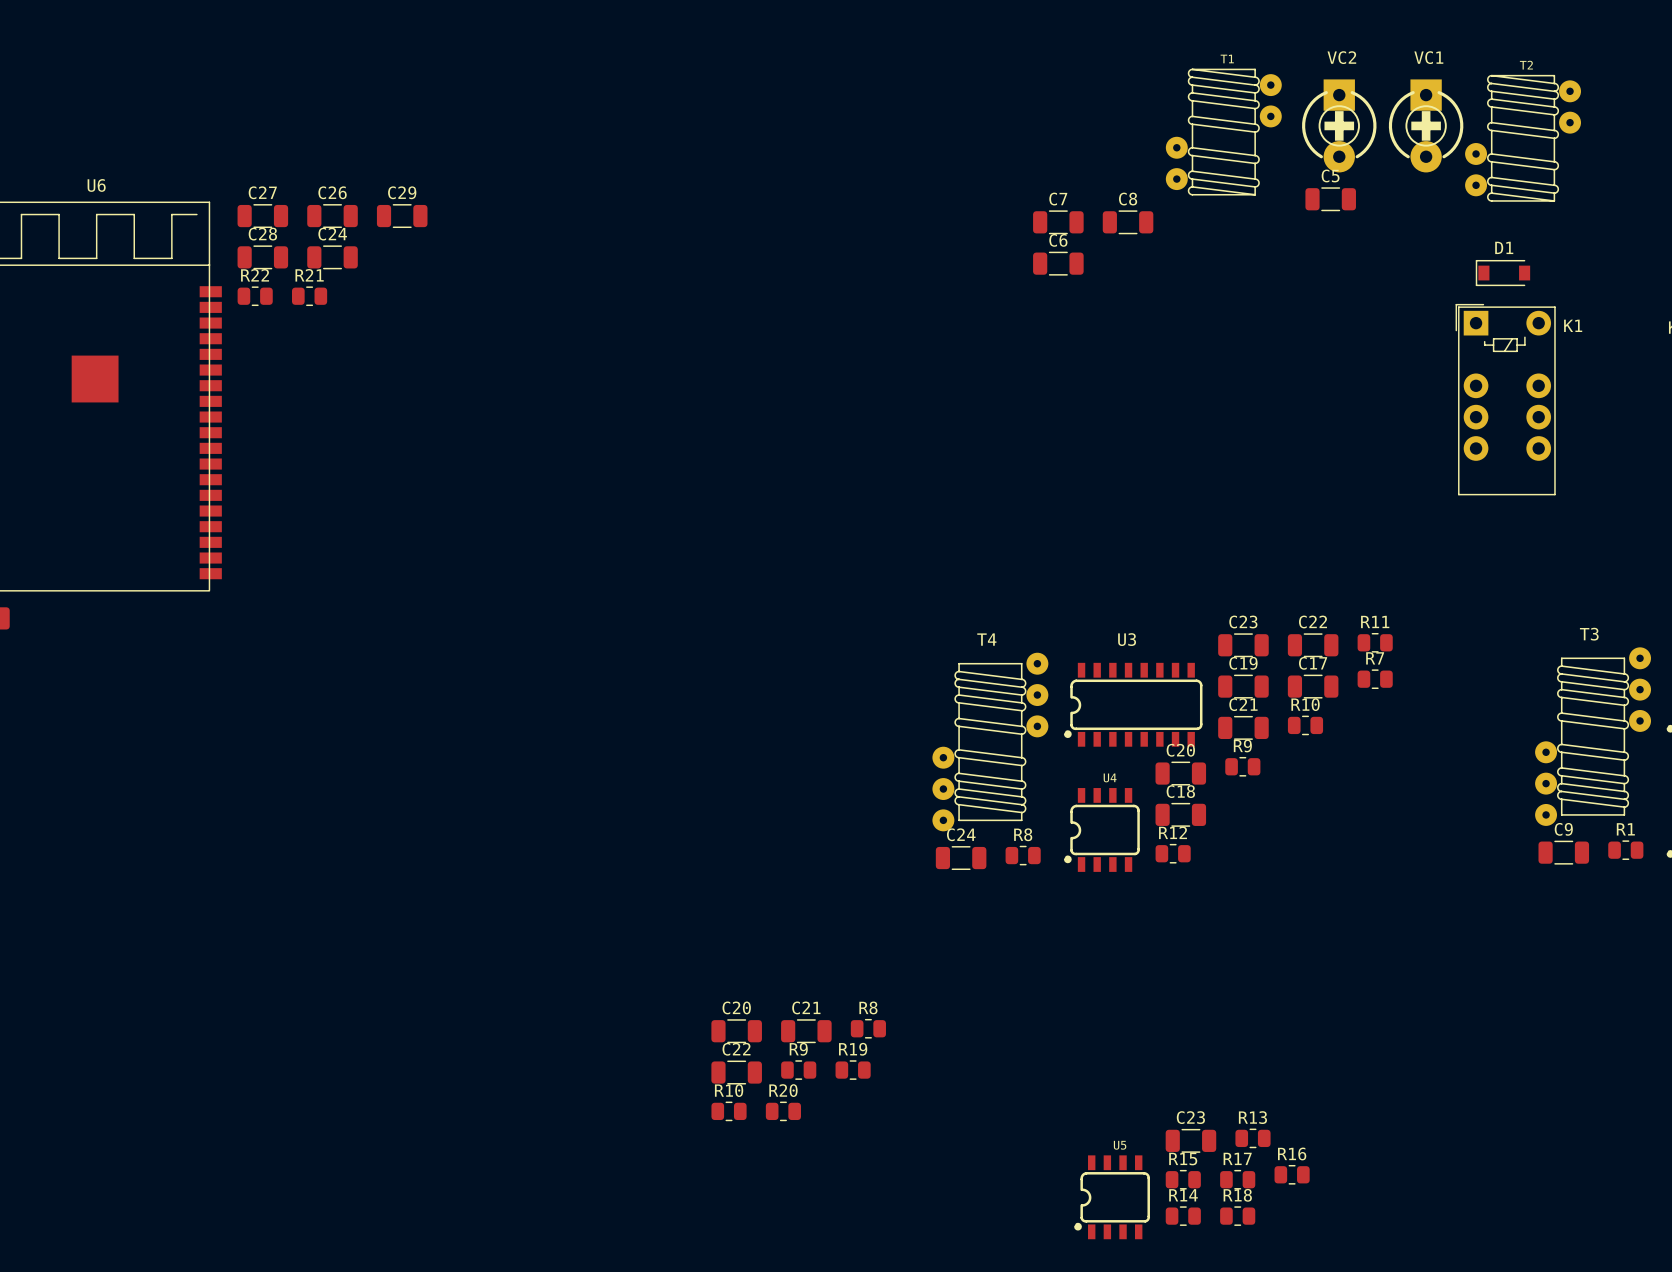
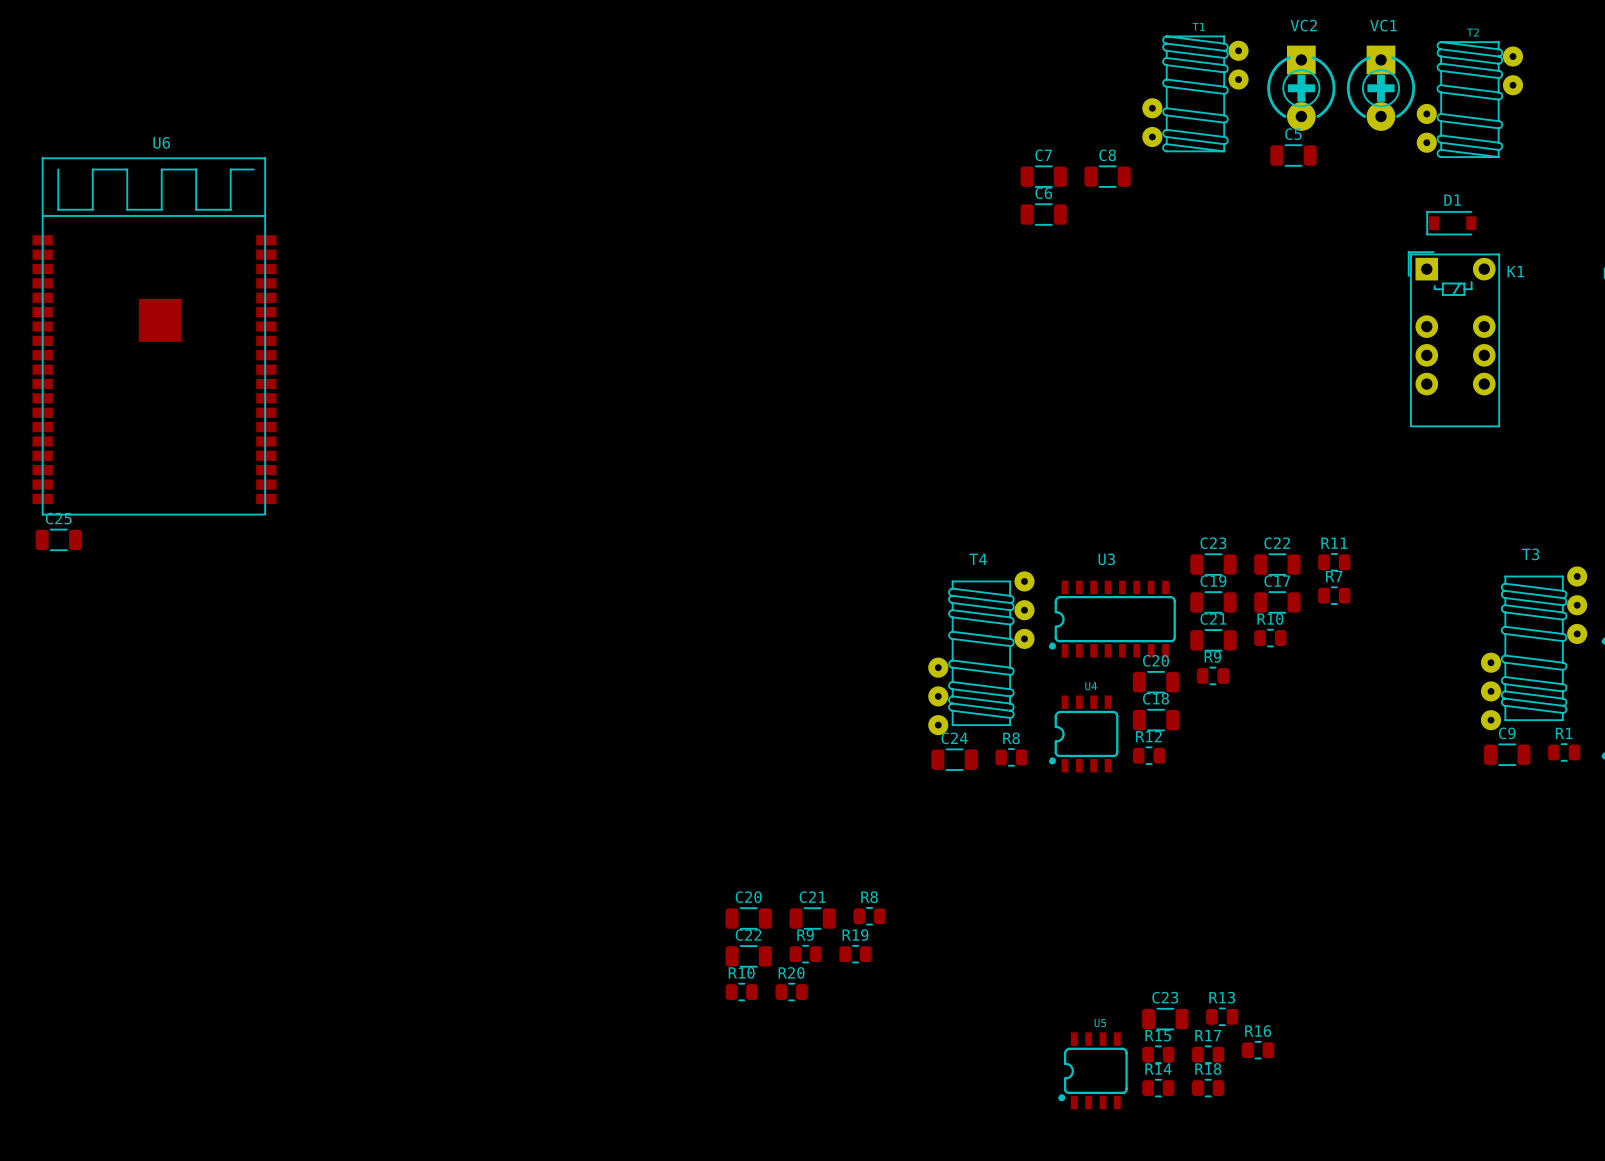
C27: (262, 216) -> none
C26: (332, 216) -> none
C29: (402, 216) -> none
C28: (262, 257) -> none
C24: (332, 257) -> none
R22: (255, 296) -> none
R21: (309, 296) -> none

